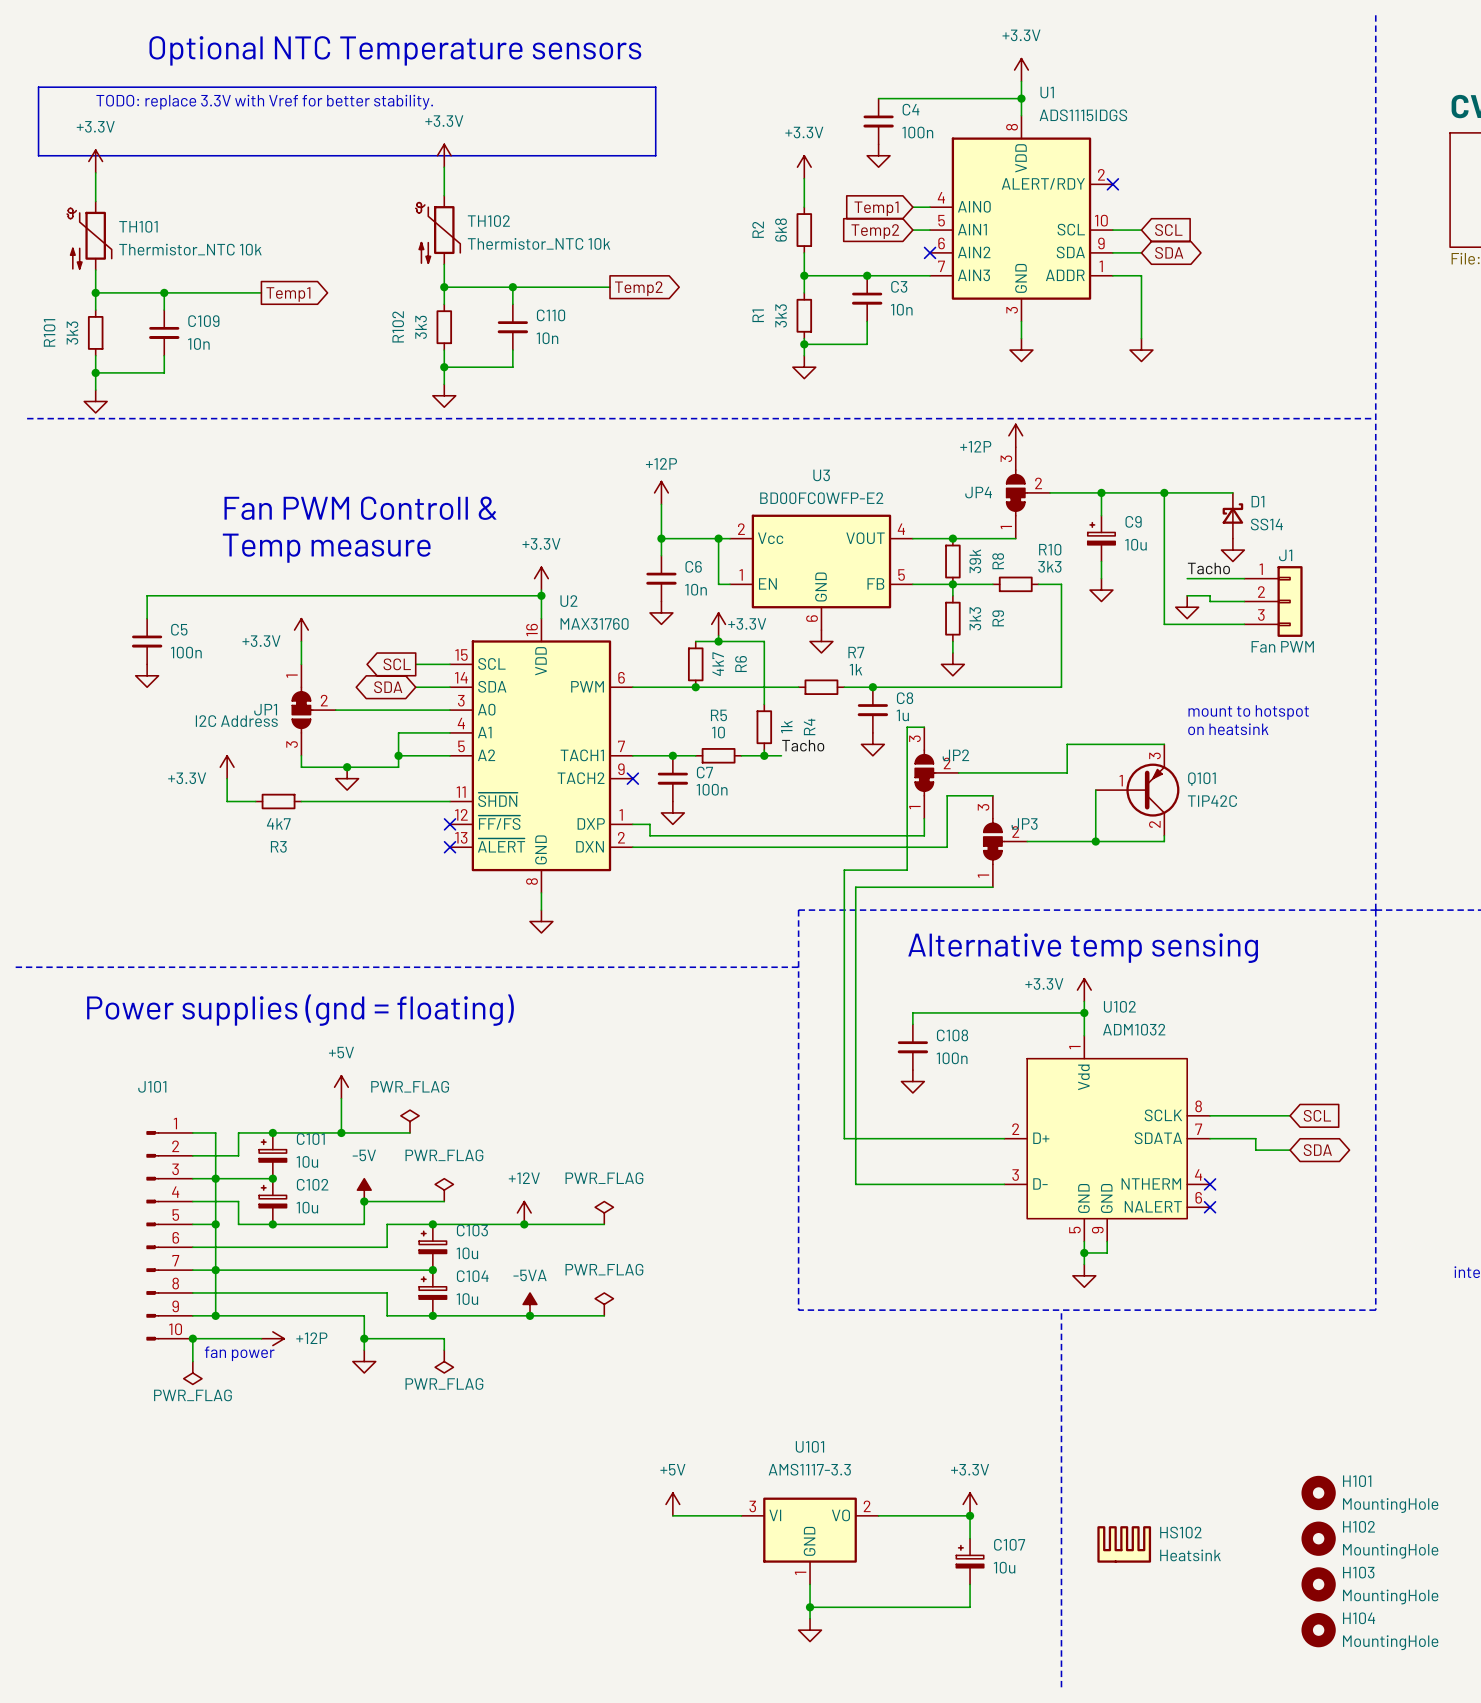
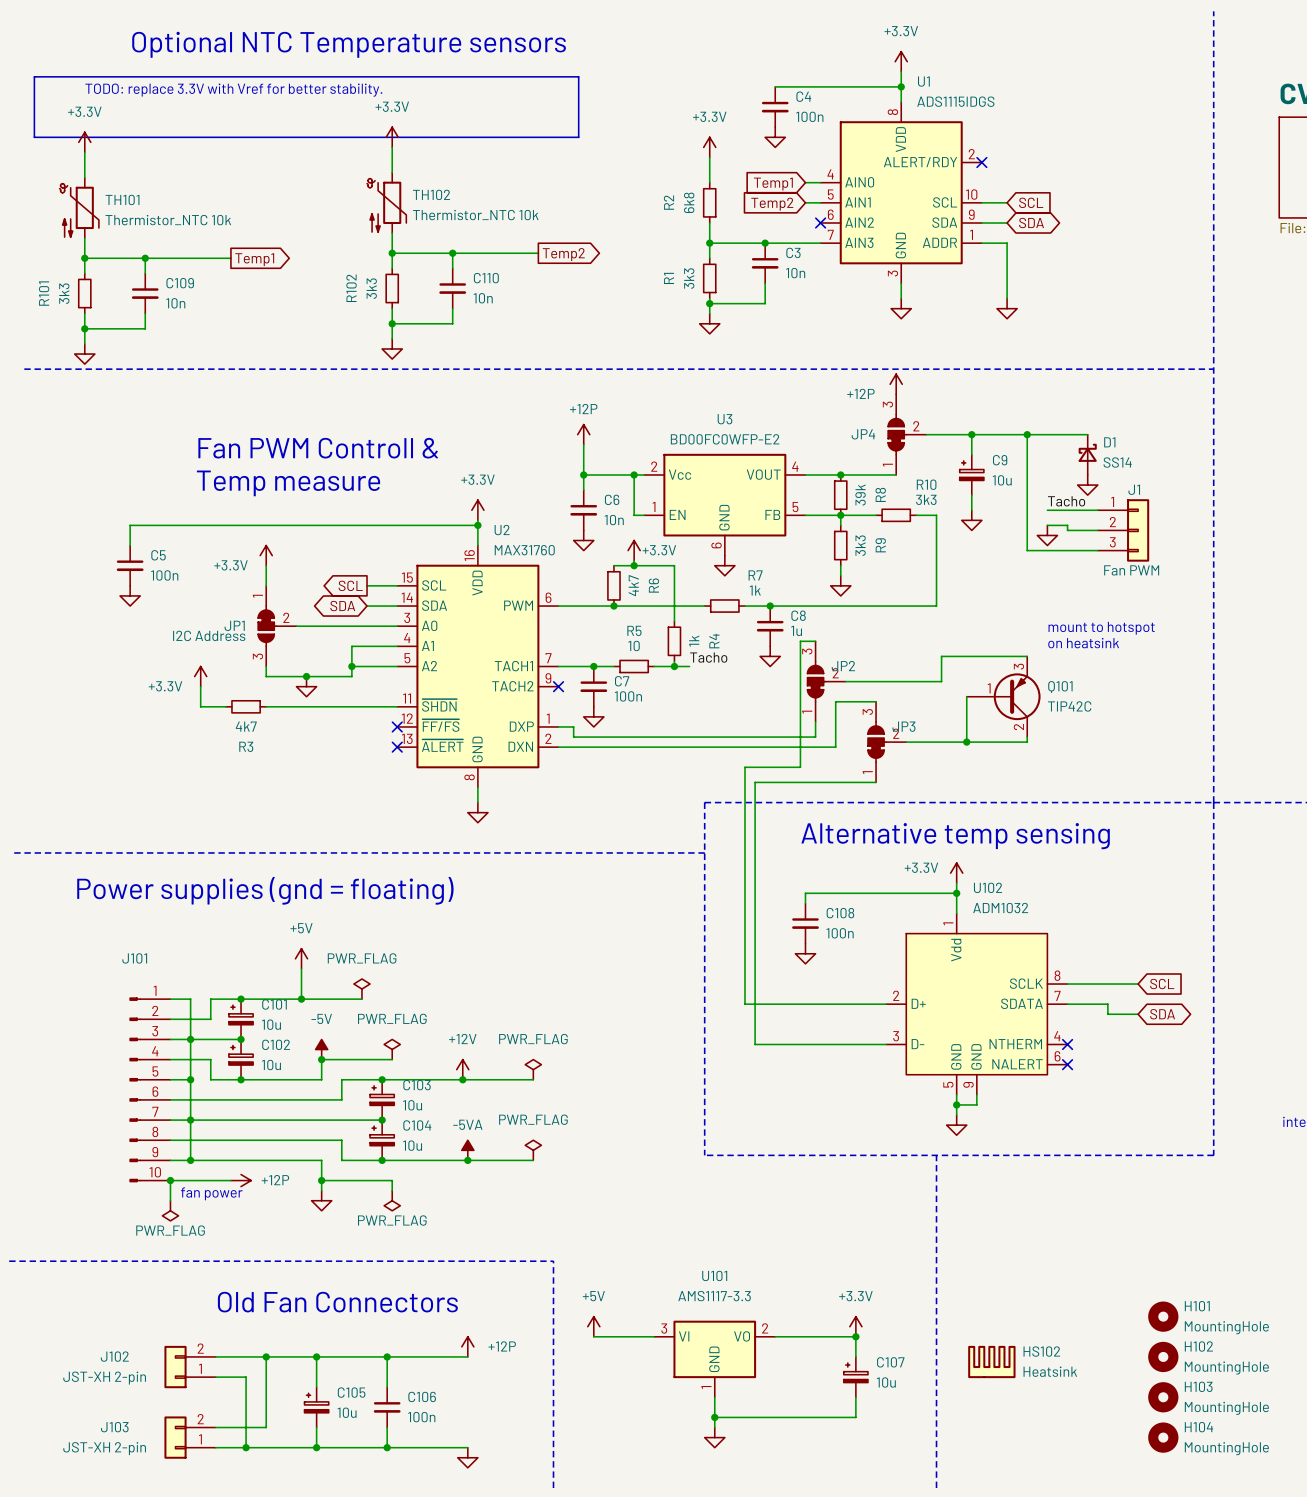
line: none -> (9, 1261) (553, 1261) (553, 1488)
text: none -> Old Fan Connectors (337, 1302)
power symbol: none -> +12P (467, 1346)
wire: none -> (215, 1356) (467, 1356)
wire: none -> (266, 1356) (266, 1427) (215, 1427)
junction: none -> (266, 1356)
wire: none -> (316, 1356) (316, 1387)
junction: none -> (316, 1356)
wire: none -> (387, 1356) (387, 1387)
junction: none -> (387, 1356)
J102: none -> JST-XH 2-pin (190, 1367)
wire: none -> (215, 1377) (246, 1377) (246, 1447)
C105: none -> 10u (316, 1407)
C106: none -> 100n (387, 1407)
wire: none -> (316, 1427) (316, 1447)
wire: none -> (387, 1427) (387, 1447)
J103: none -> JST-XH 2-pin (190, 1437)
wire: none -> (215, 1447) (467, 1447)
junction: none -> (246, 1447)
junction: none -> (316, 1447)
junction: none -> (387, 1447)
power symbol: none -> (467, 1457)

